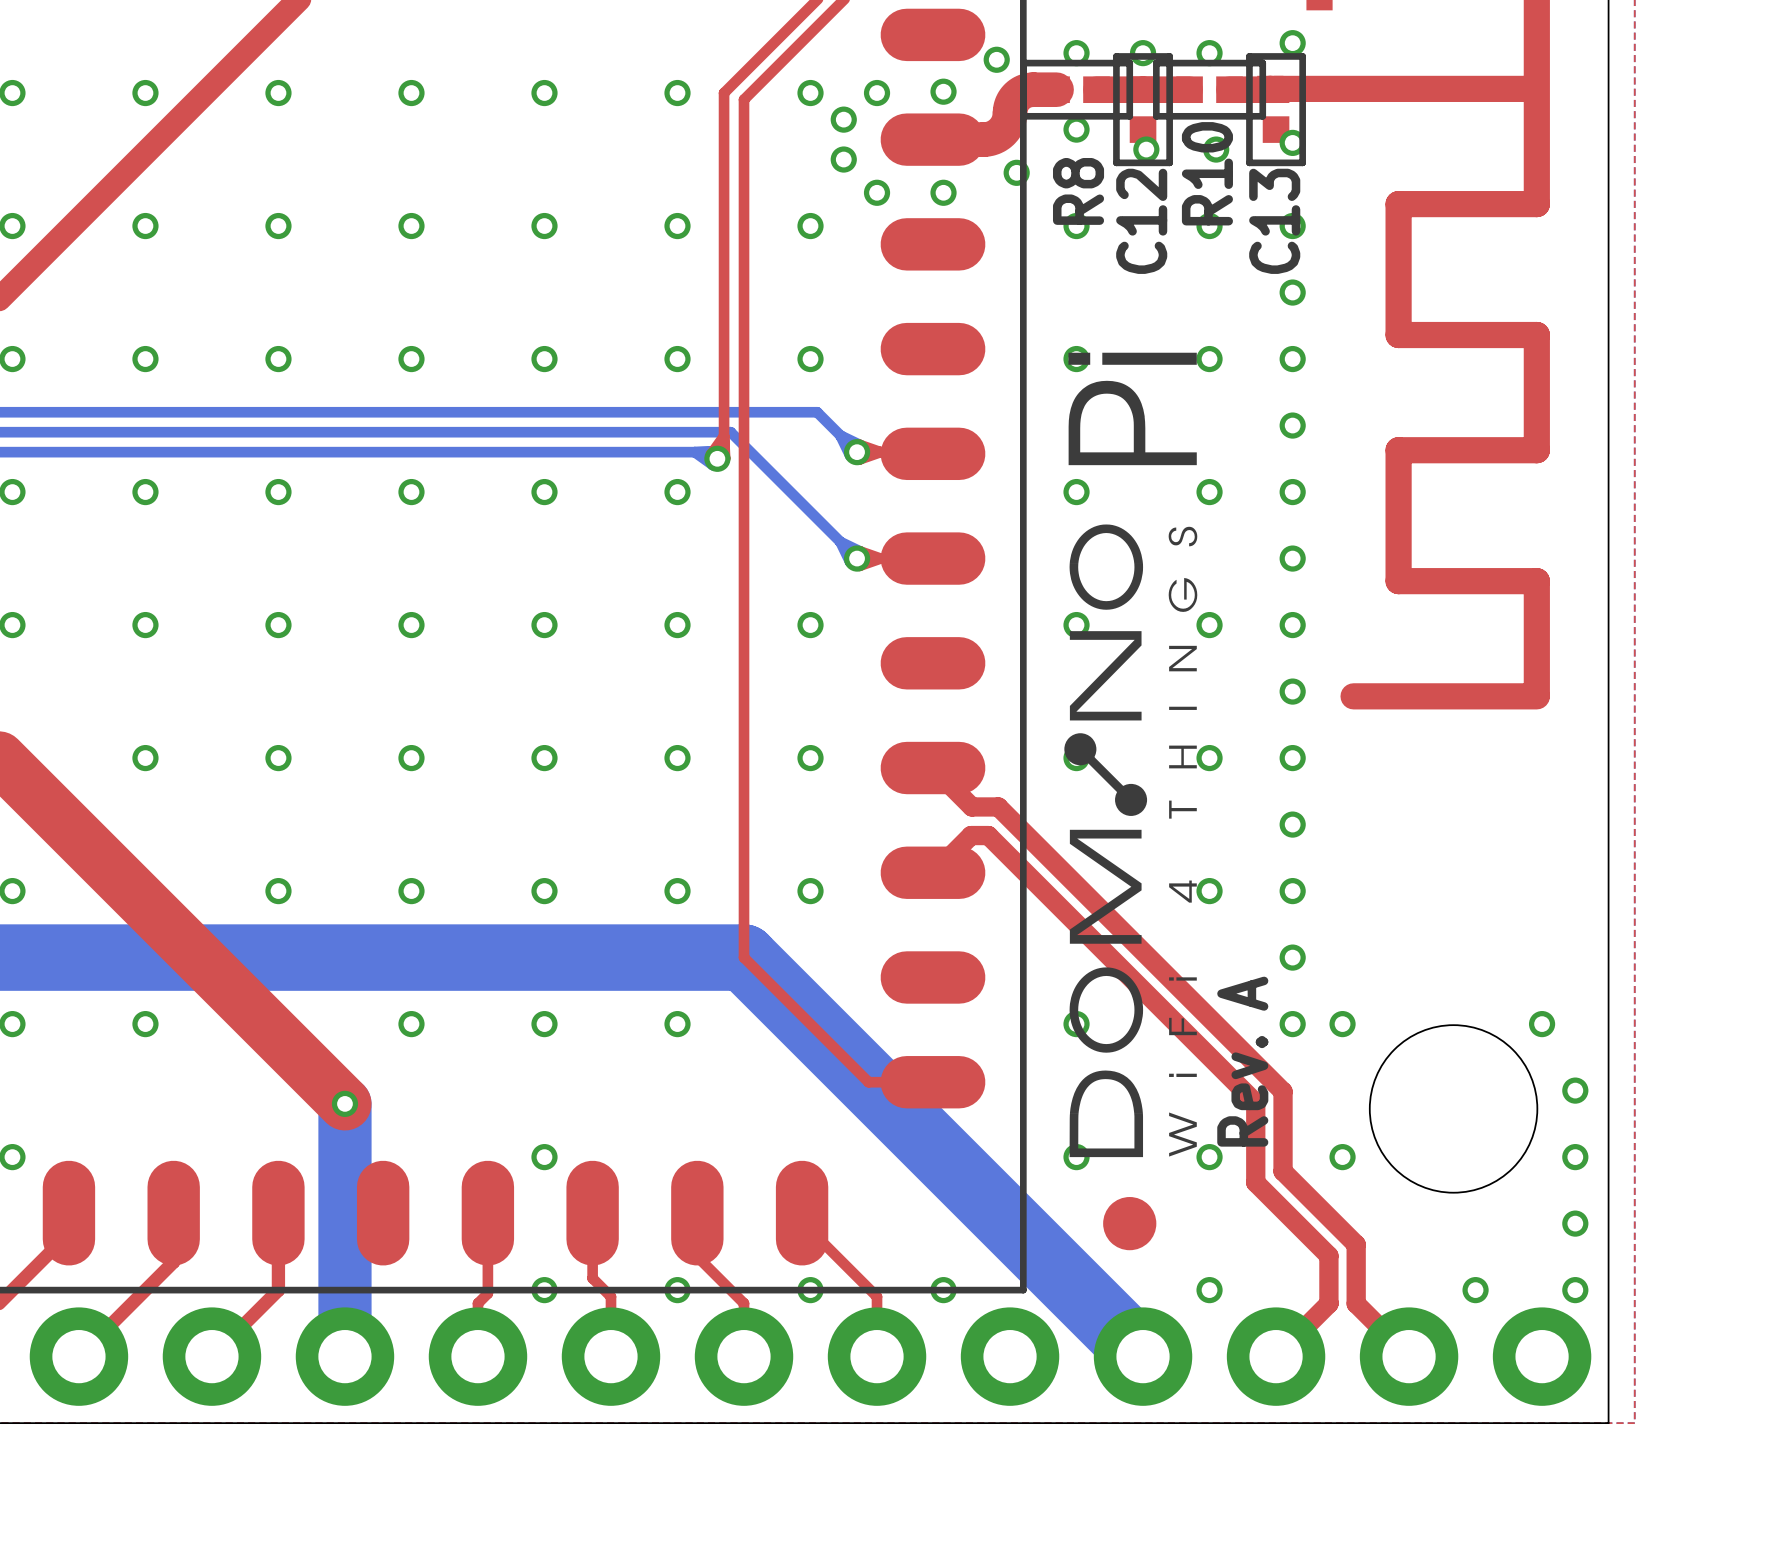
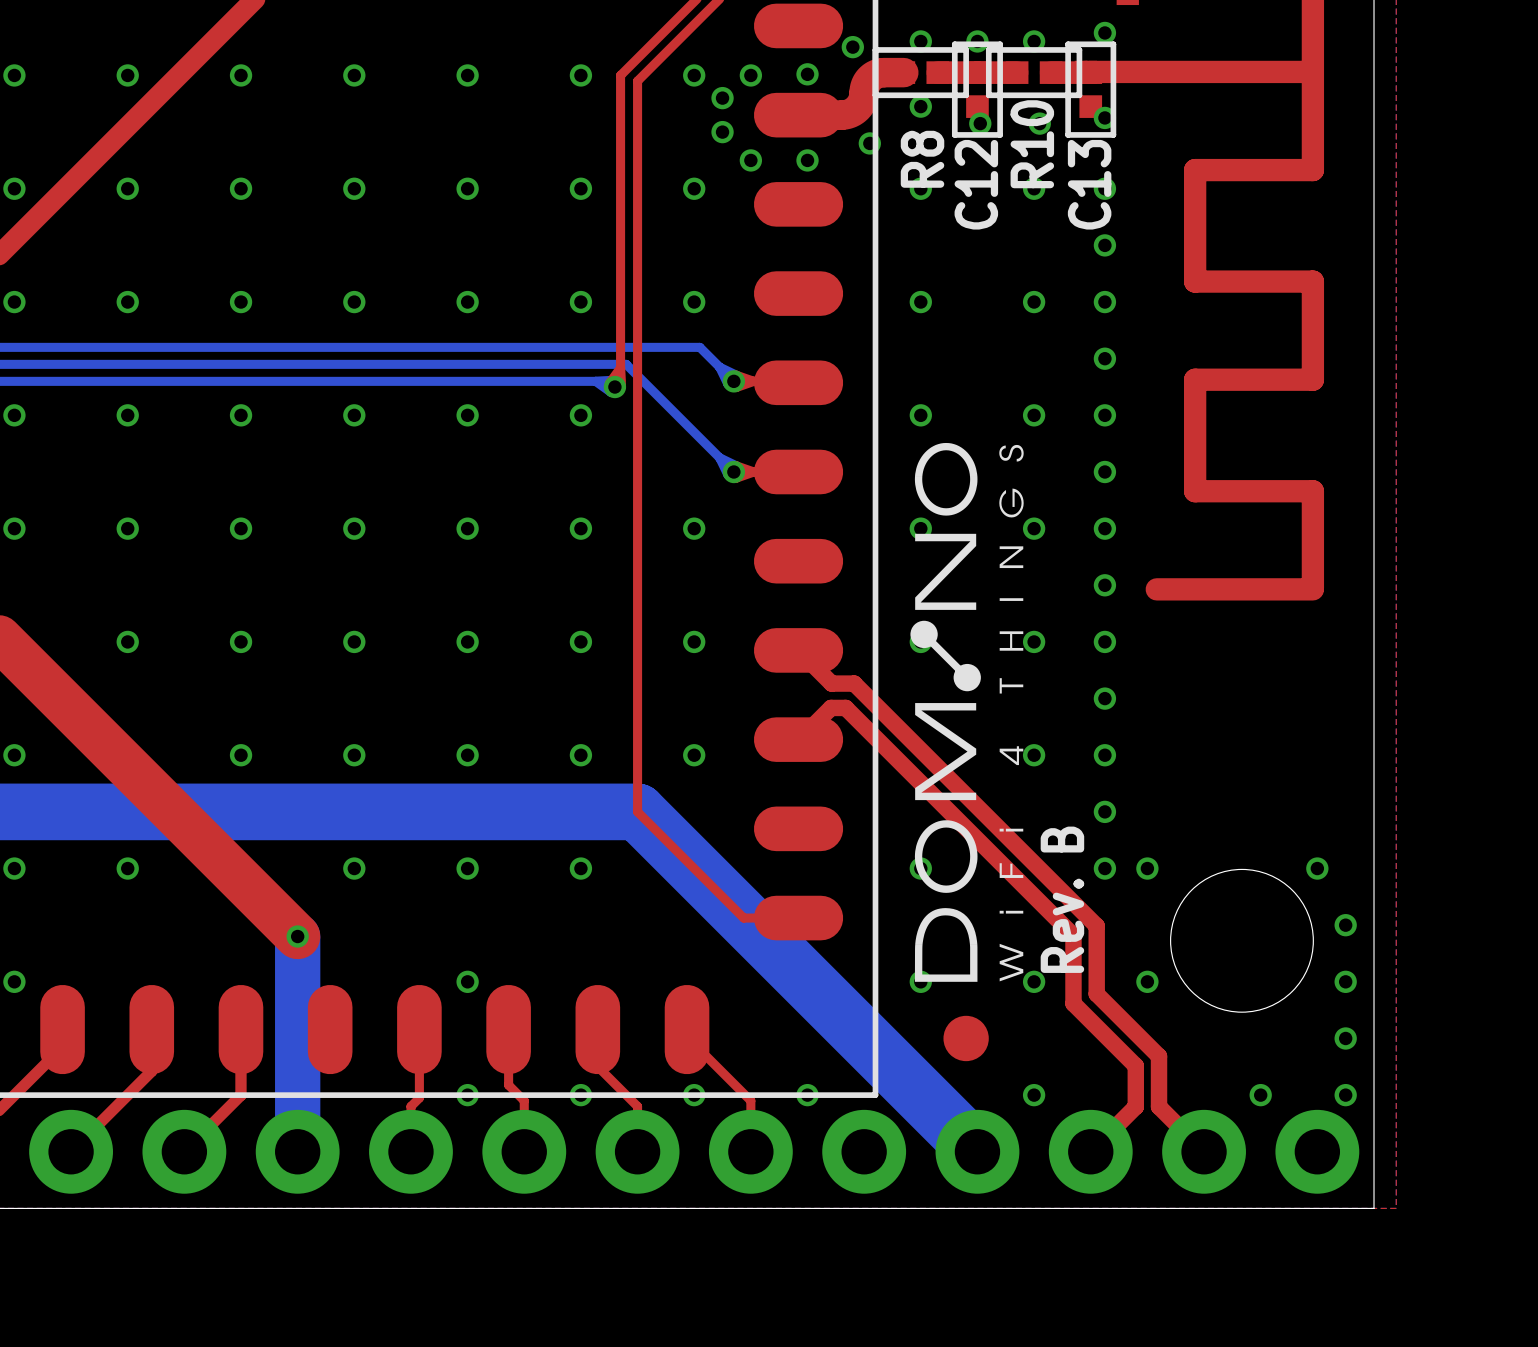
drawing: [1064, 352, 1198, 1158] -> none
text: A (1242, 993) -> B (1062, 839)

